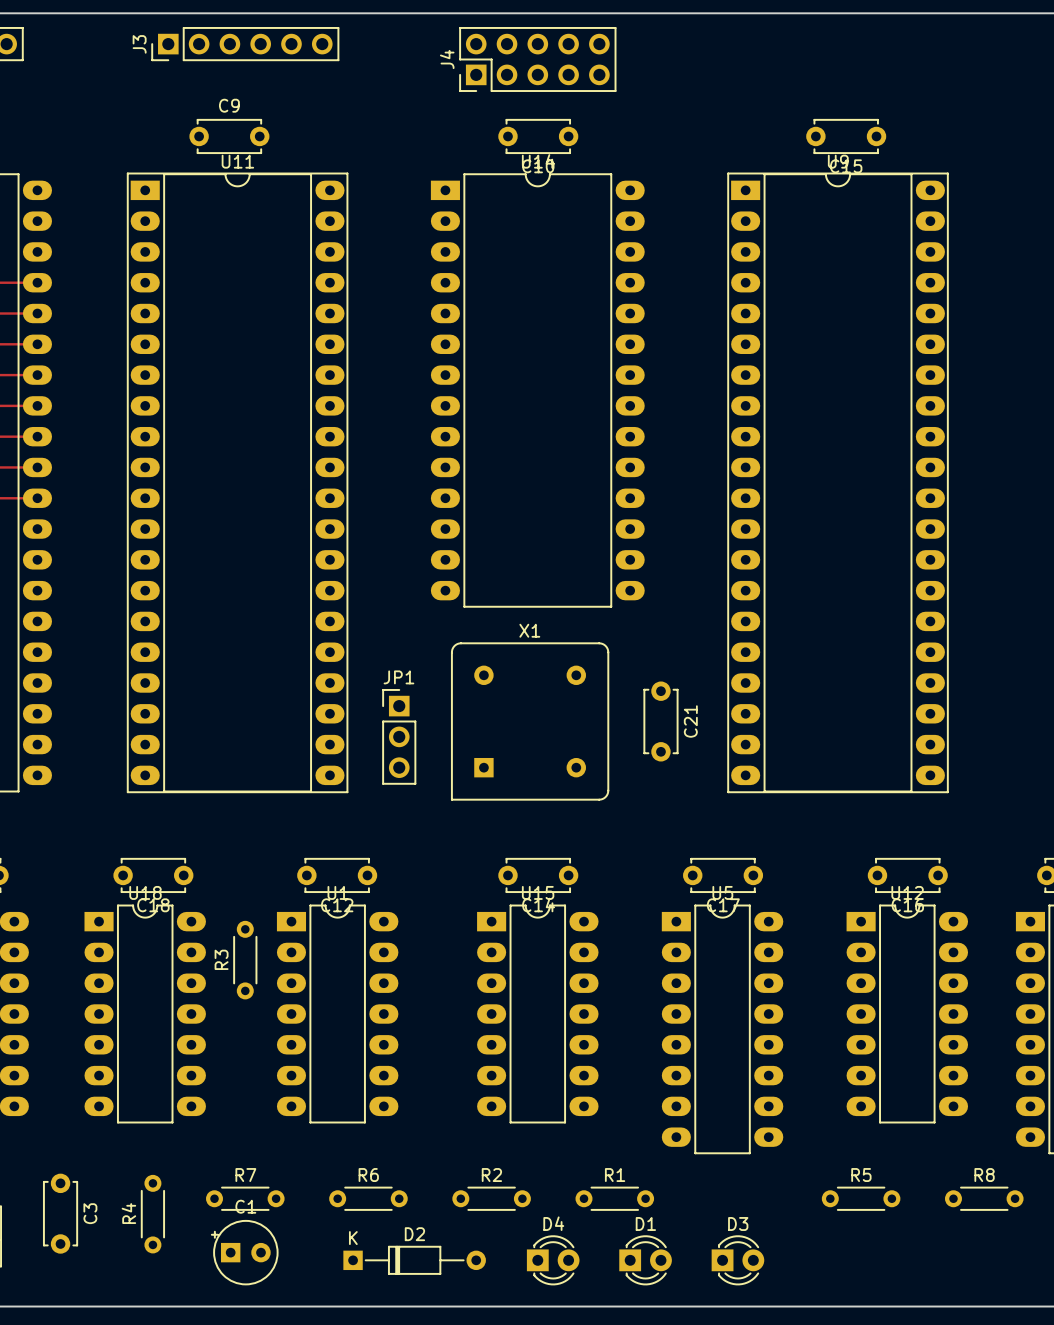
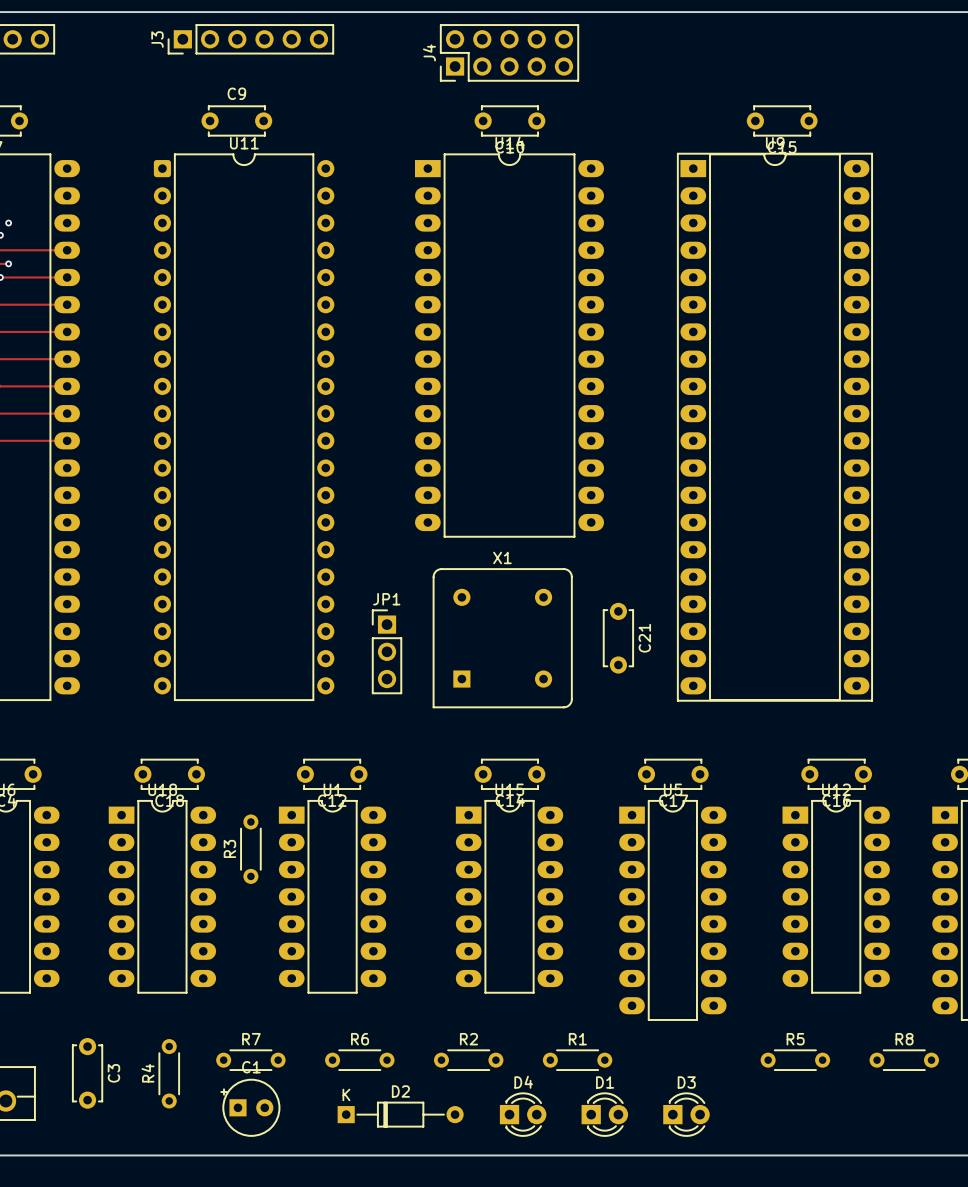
U11 footprint: [127, 172, 349, 793] -> [153, 153, 335, 701]

